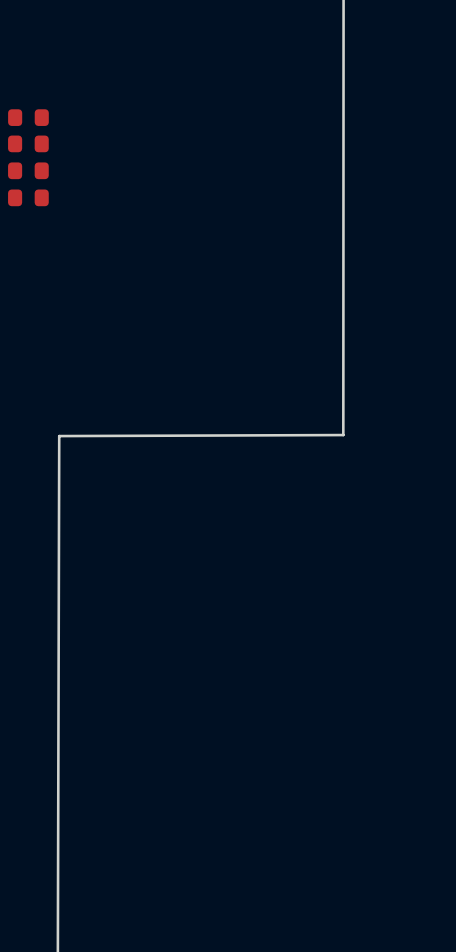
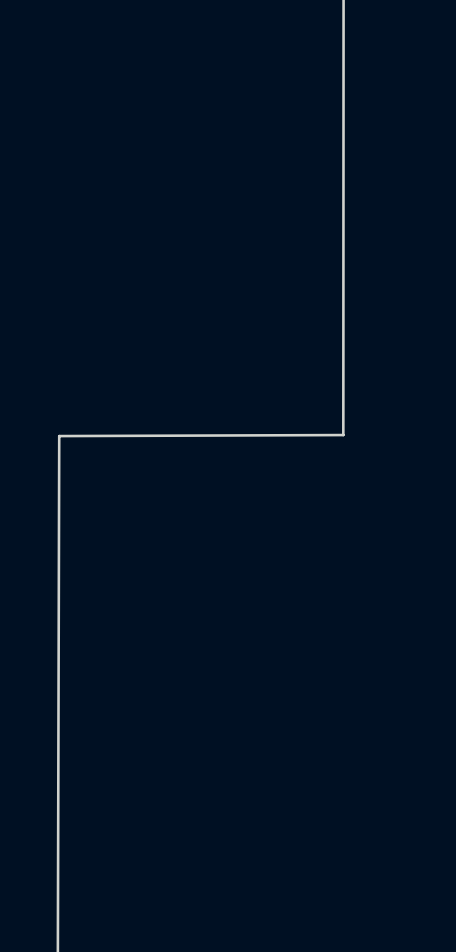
part: (28, 117) -> none
part: (28, 143) -> none
part: (28, 170) -> none
part: (28, 197) -> none

